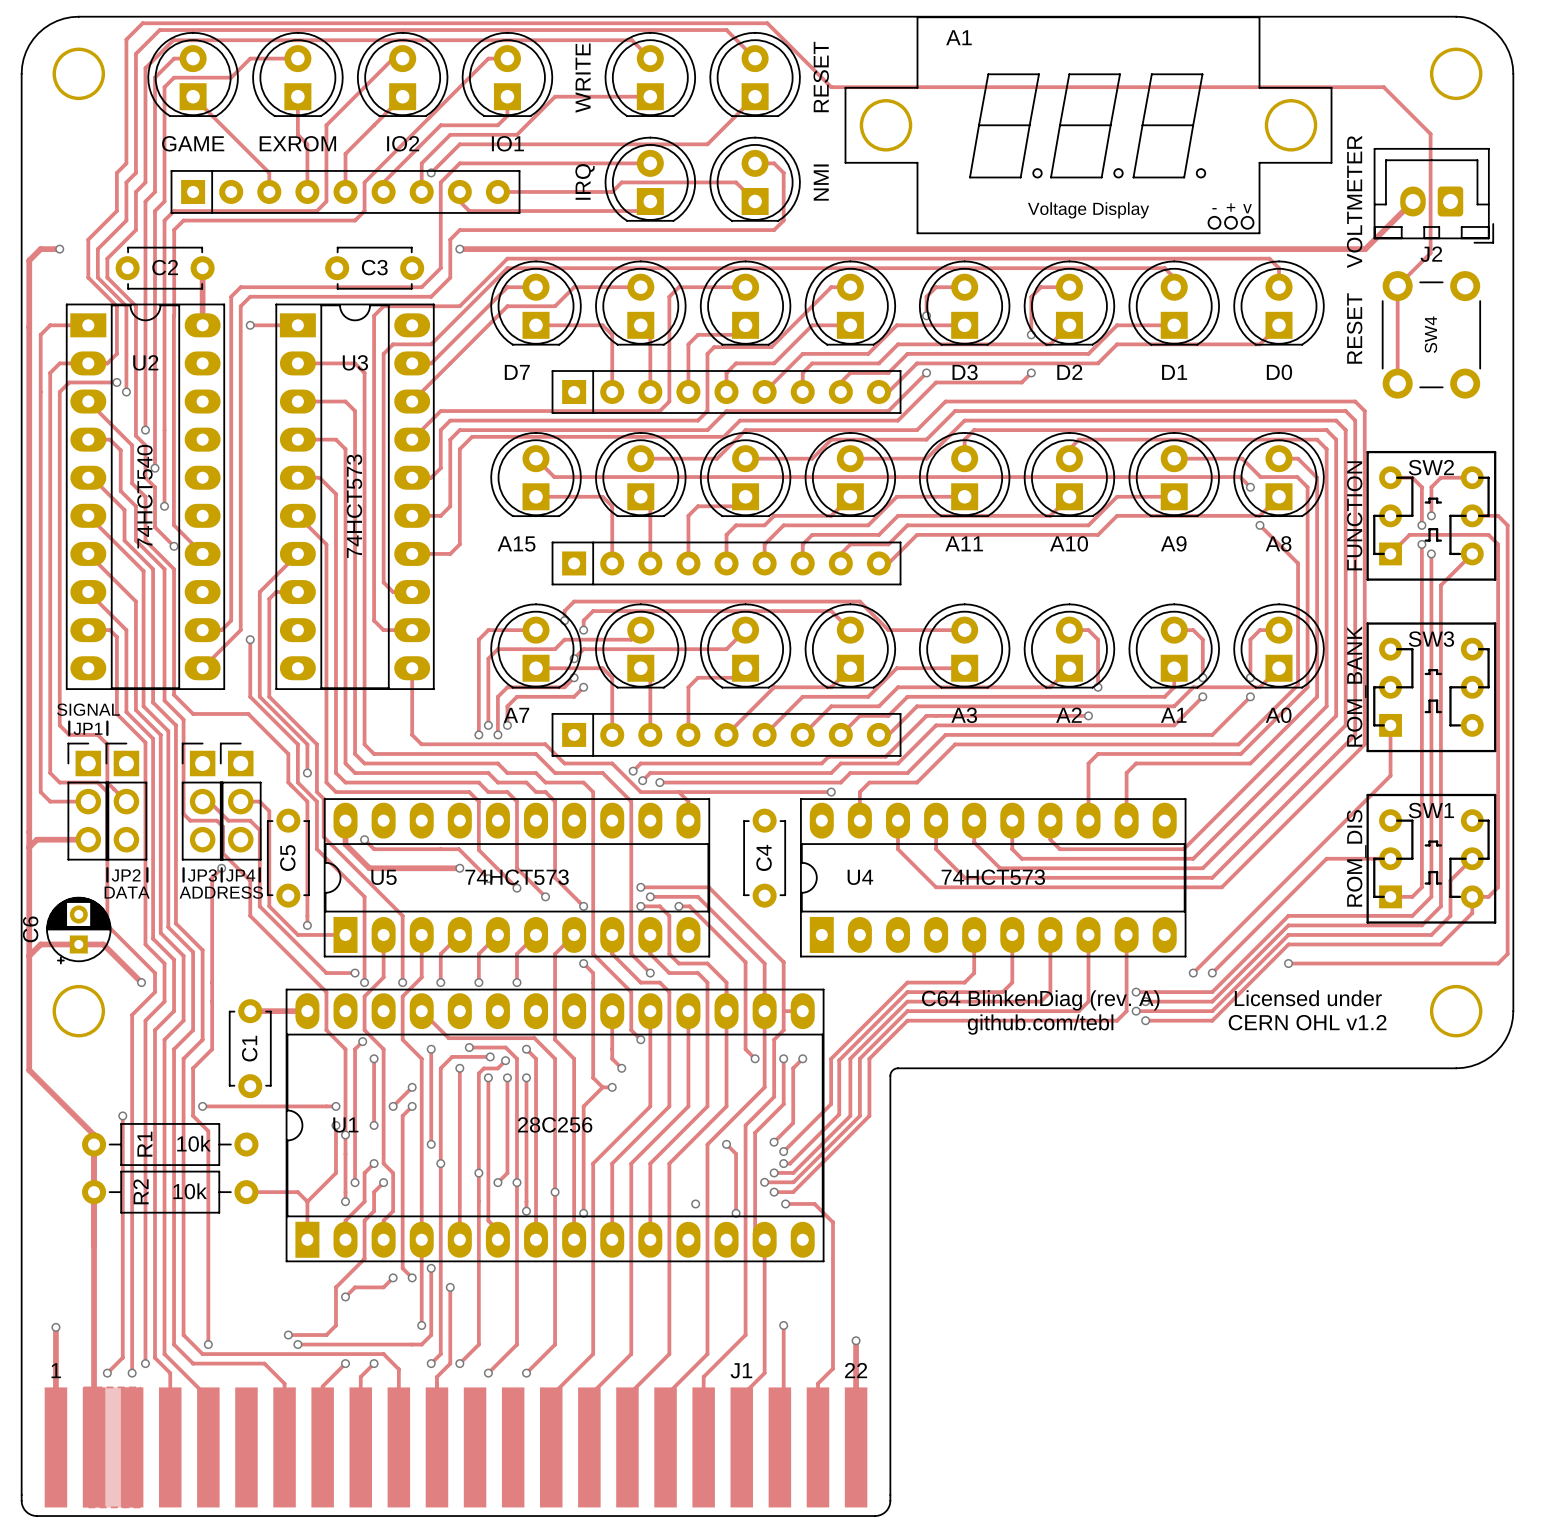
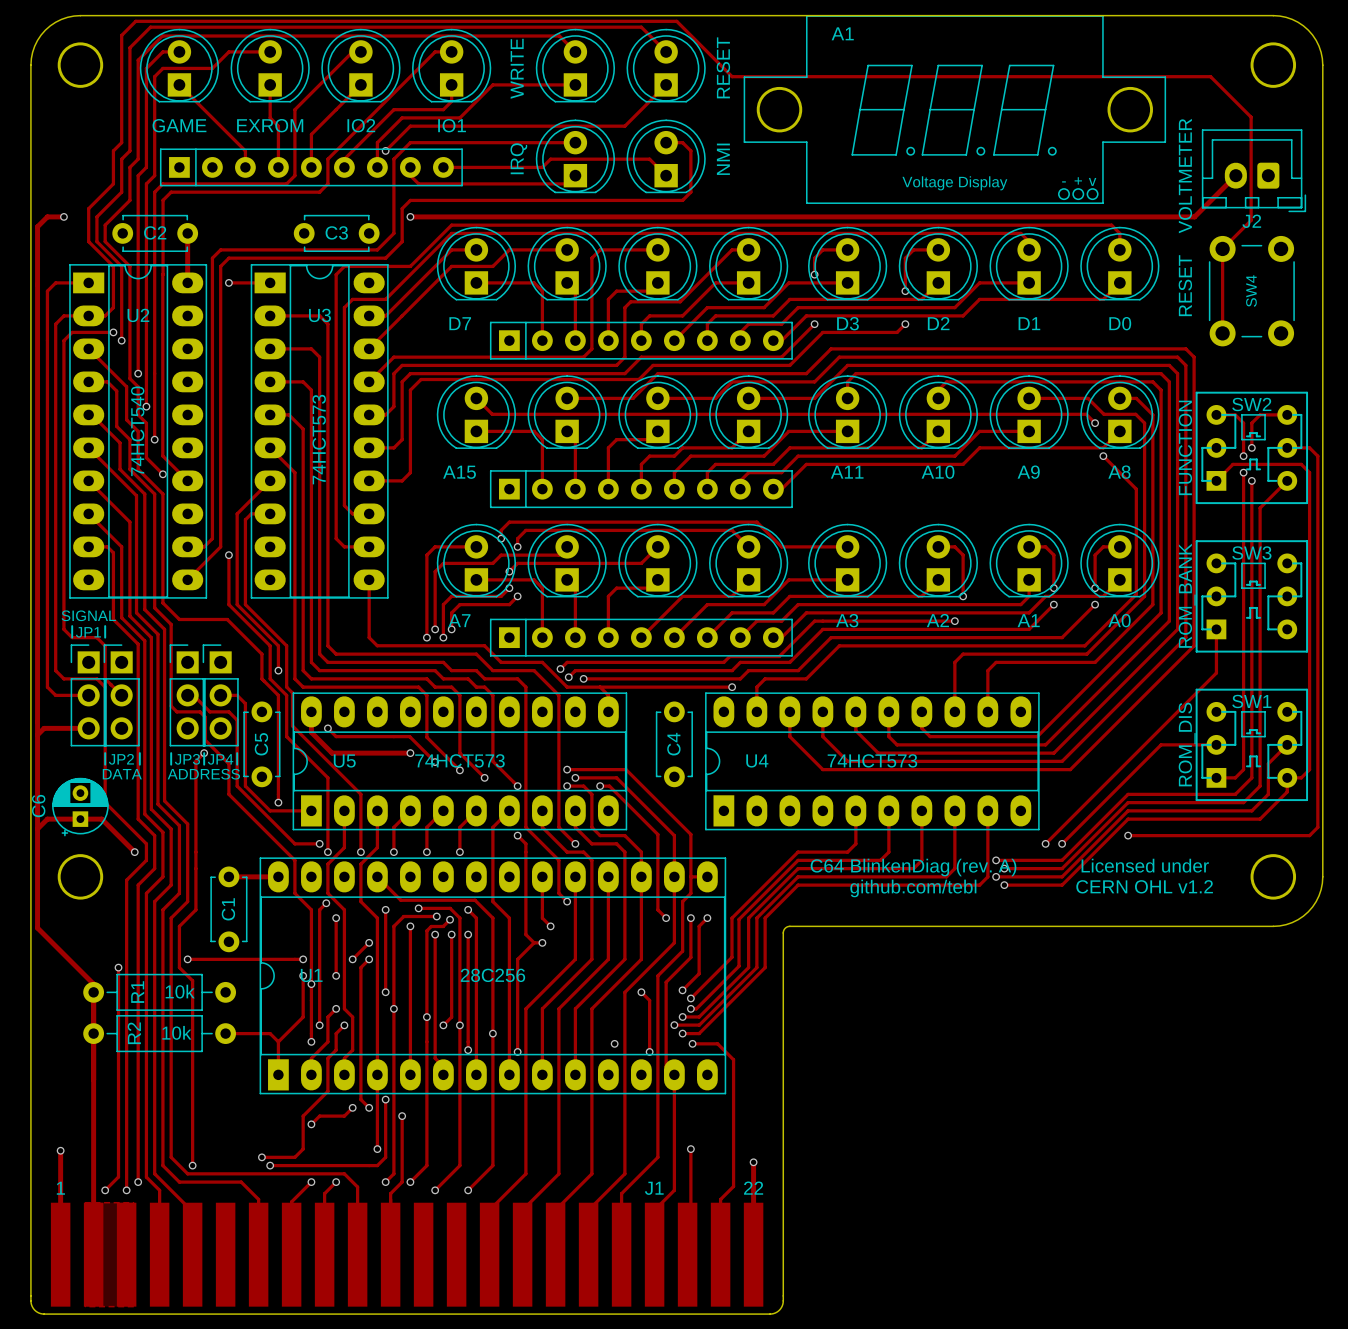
SW2 footprint: [1366, 450, 1497, 581] -> [1195, 391, 1309, 505]
SW3 footprint: [1366, 622, 1497, 753] -> [1195, 540, 1309, 653]
SW1 footprint: [1366, 793, 1497, 924] -> [1195, 688, 1309, 802]

